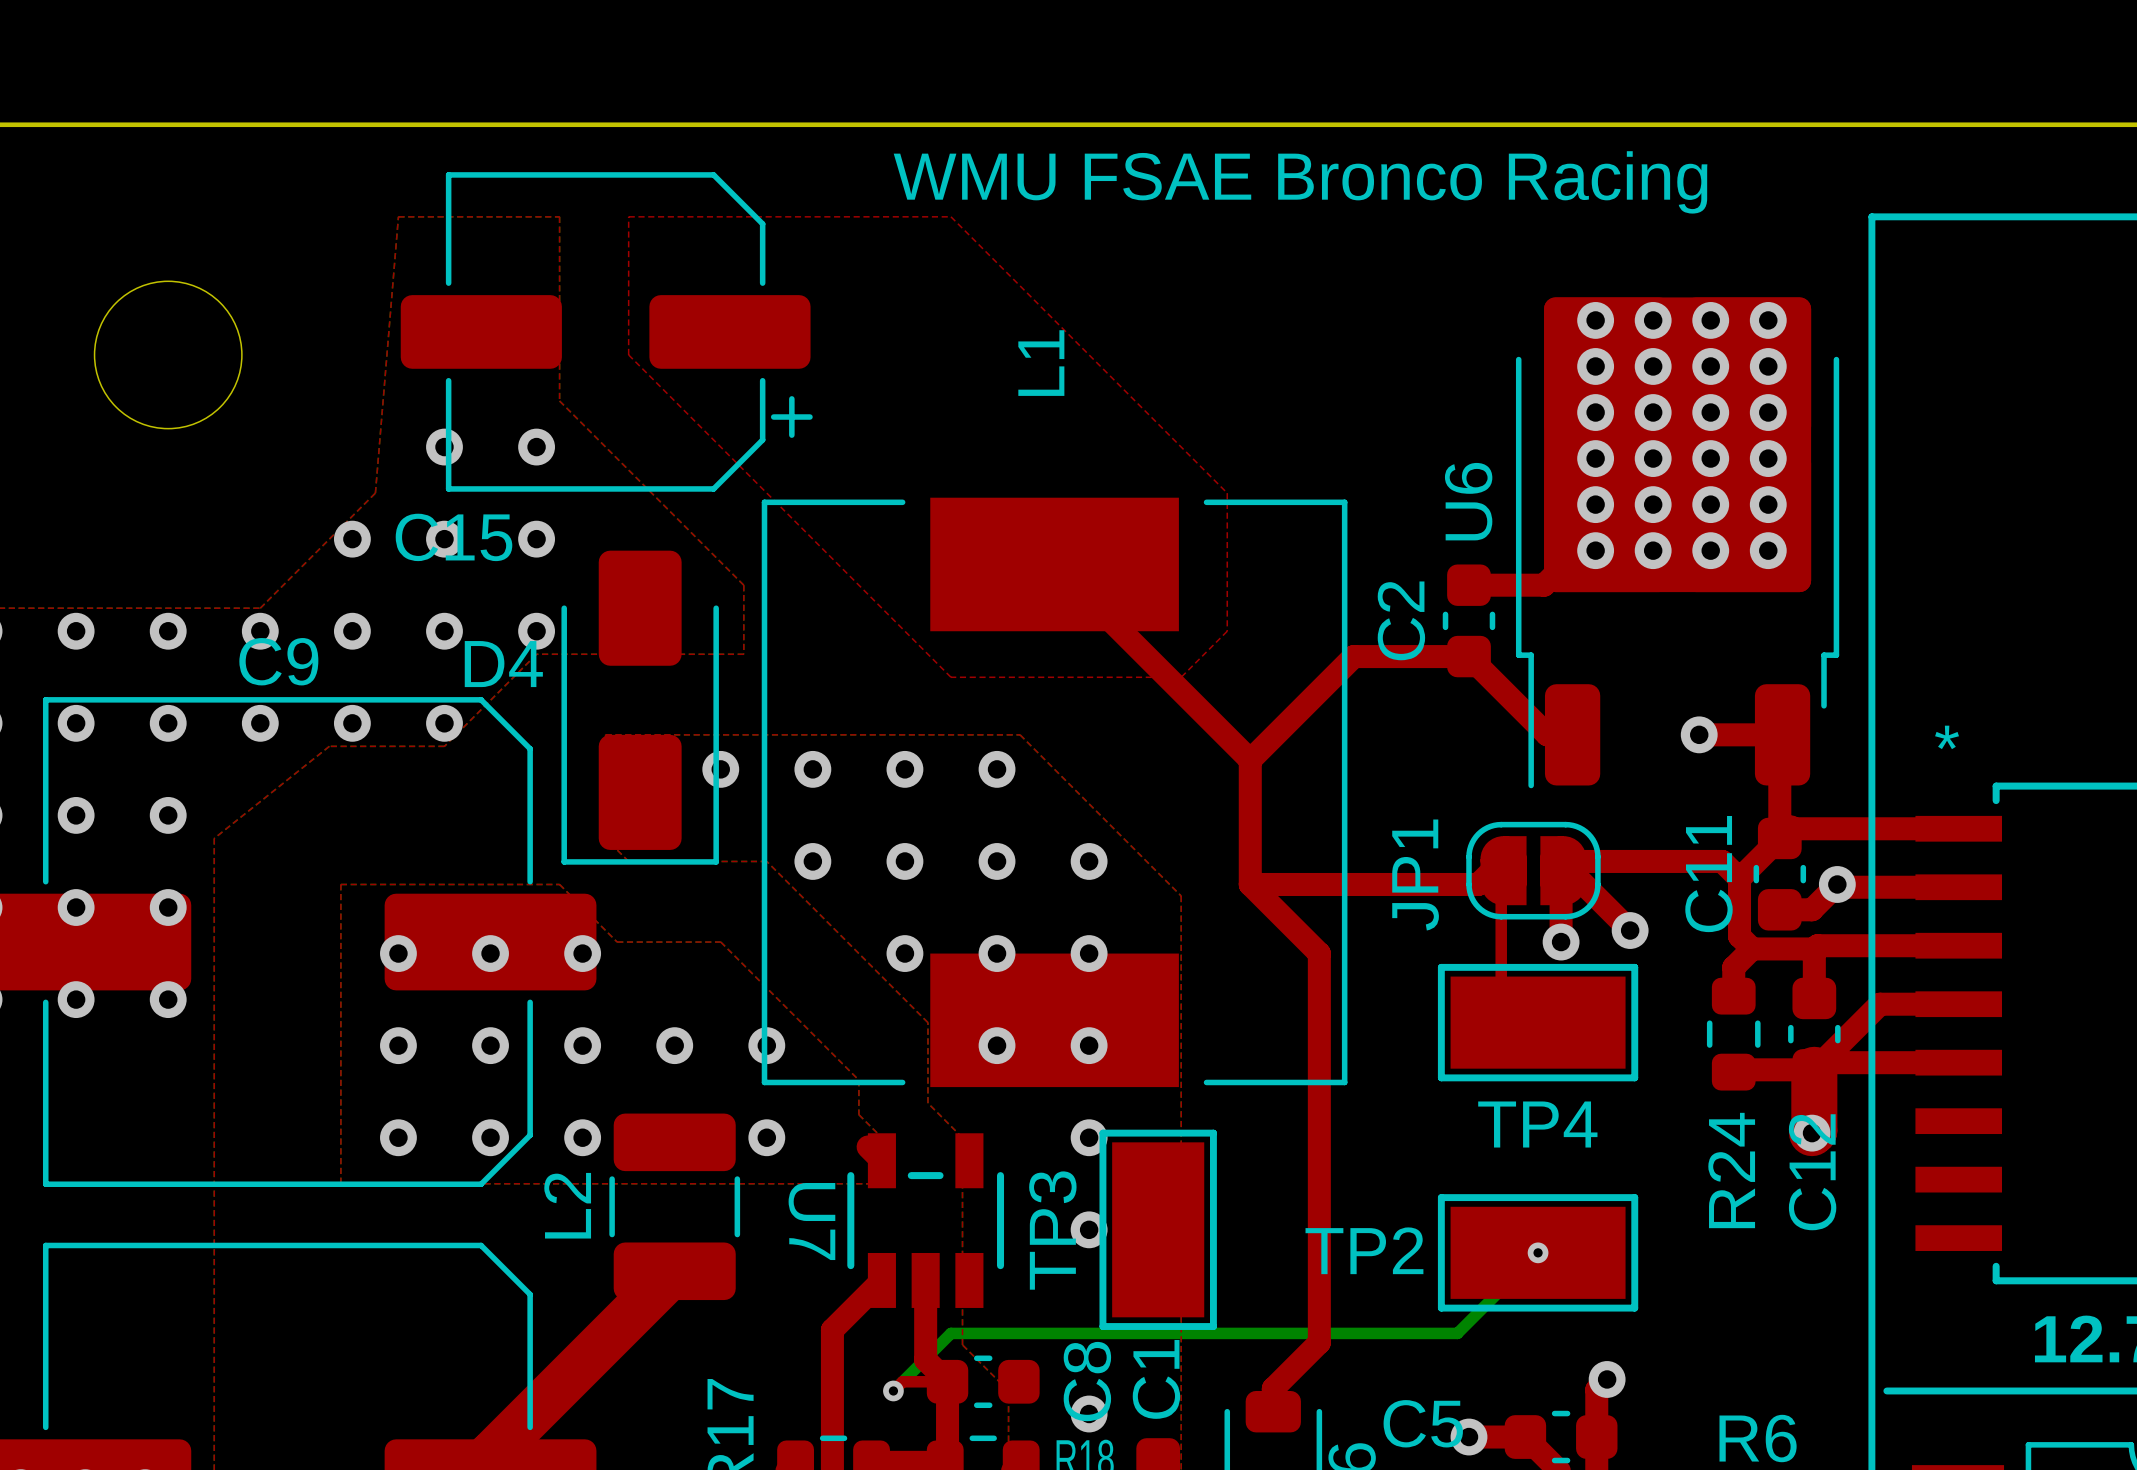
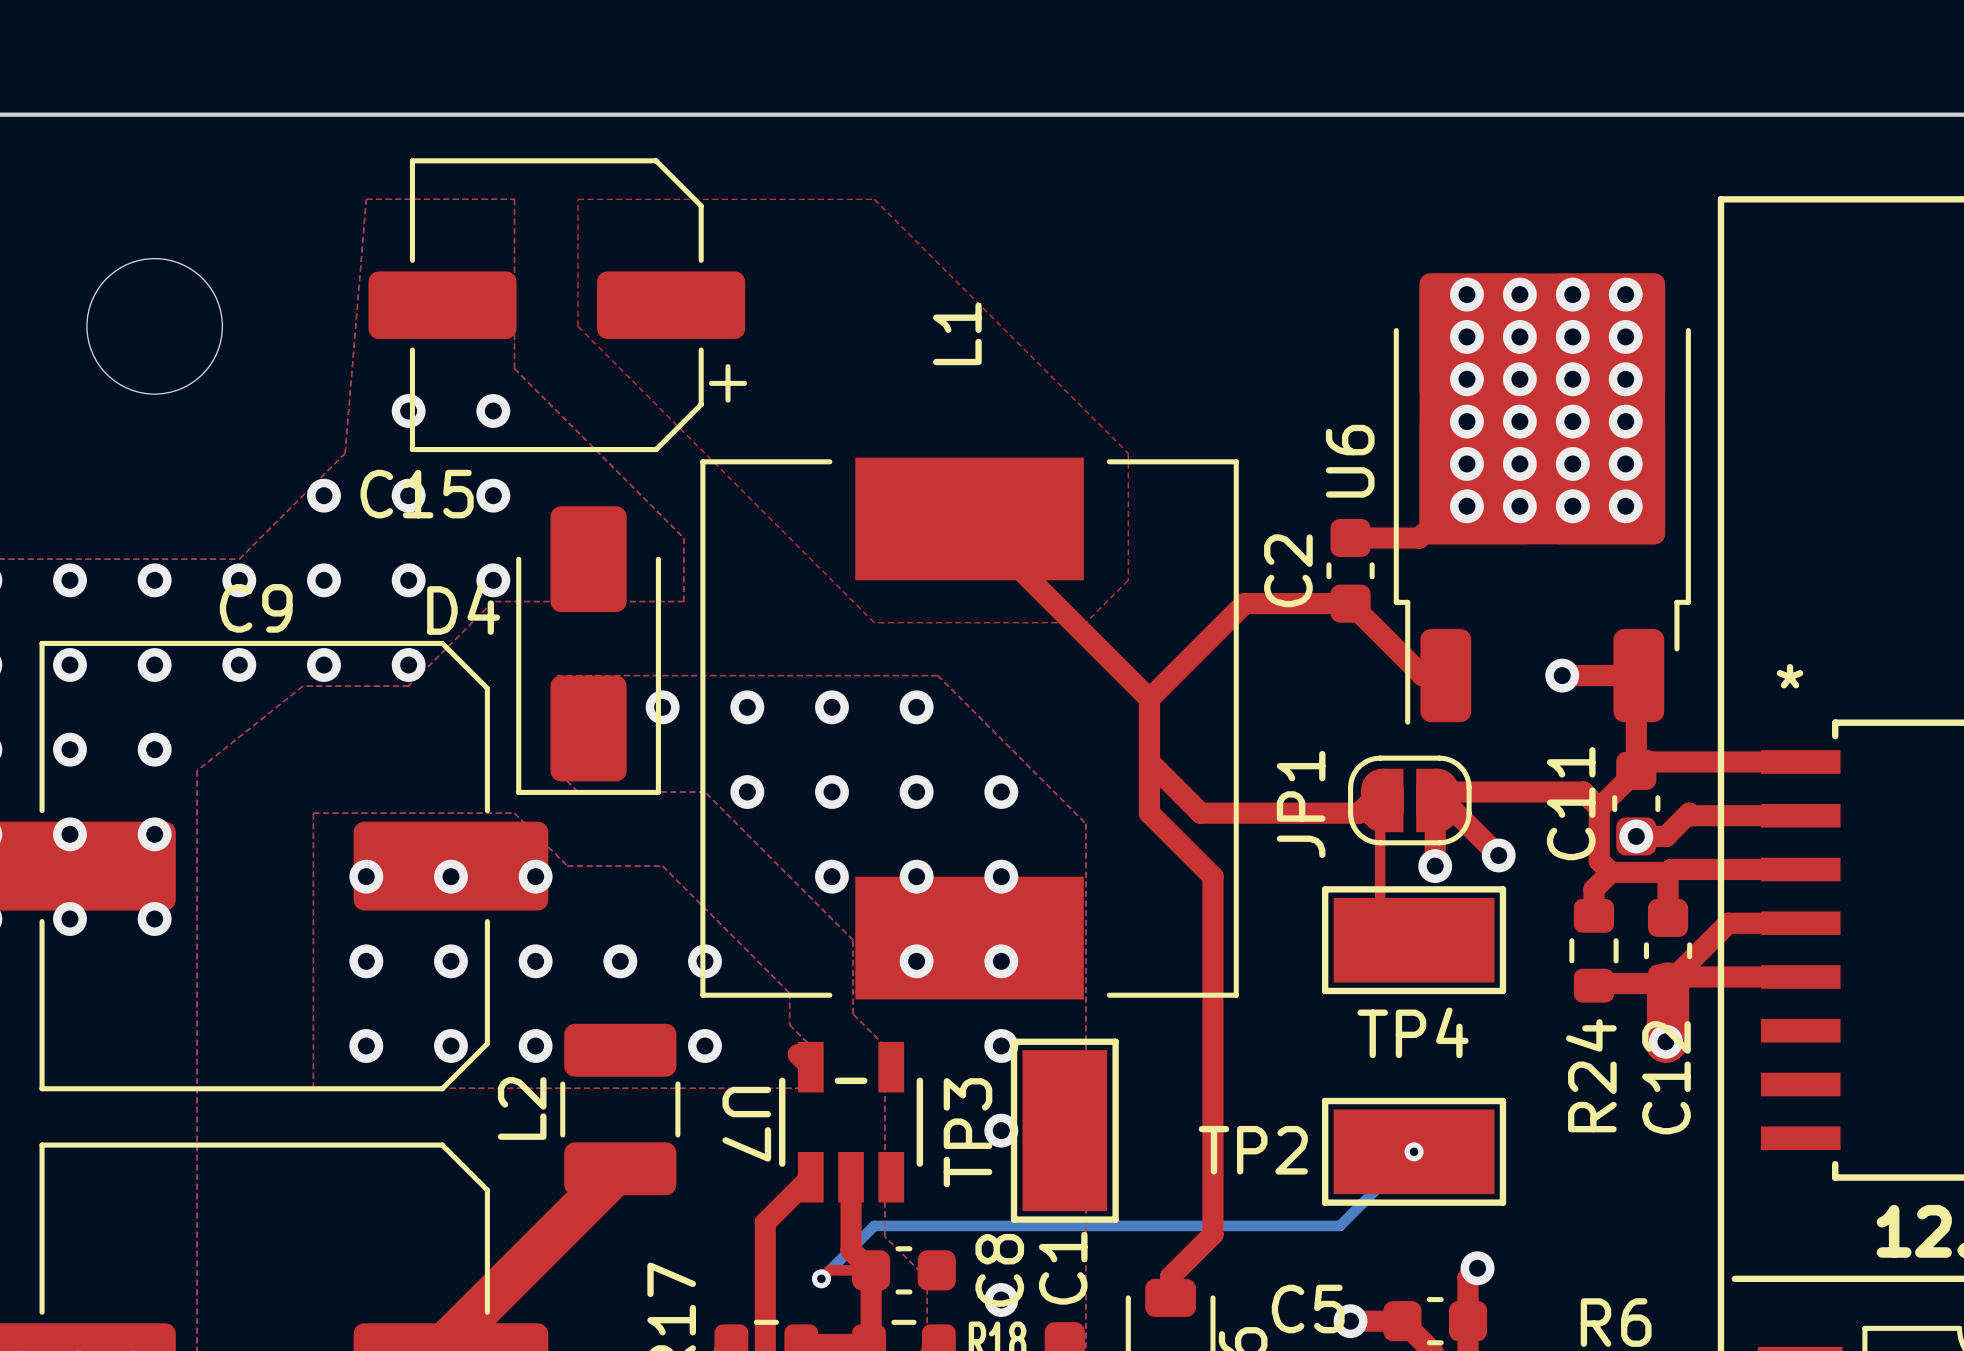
text: WMU FSAE Bronco Racing (1300, 182) -> none
top track: (1250, 884) (1305, 884) -> (1149, 761) (1200, 813)
via position: (1837, 884) -> (1636, 836)

